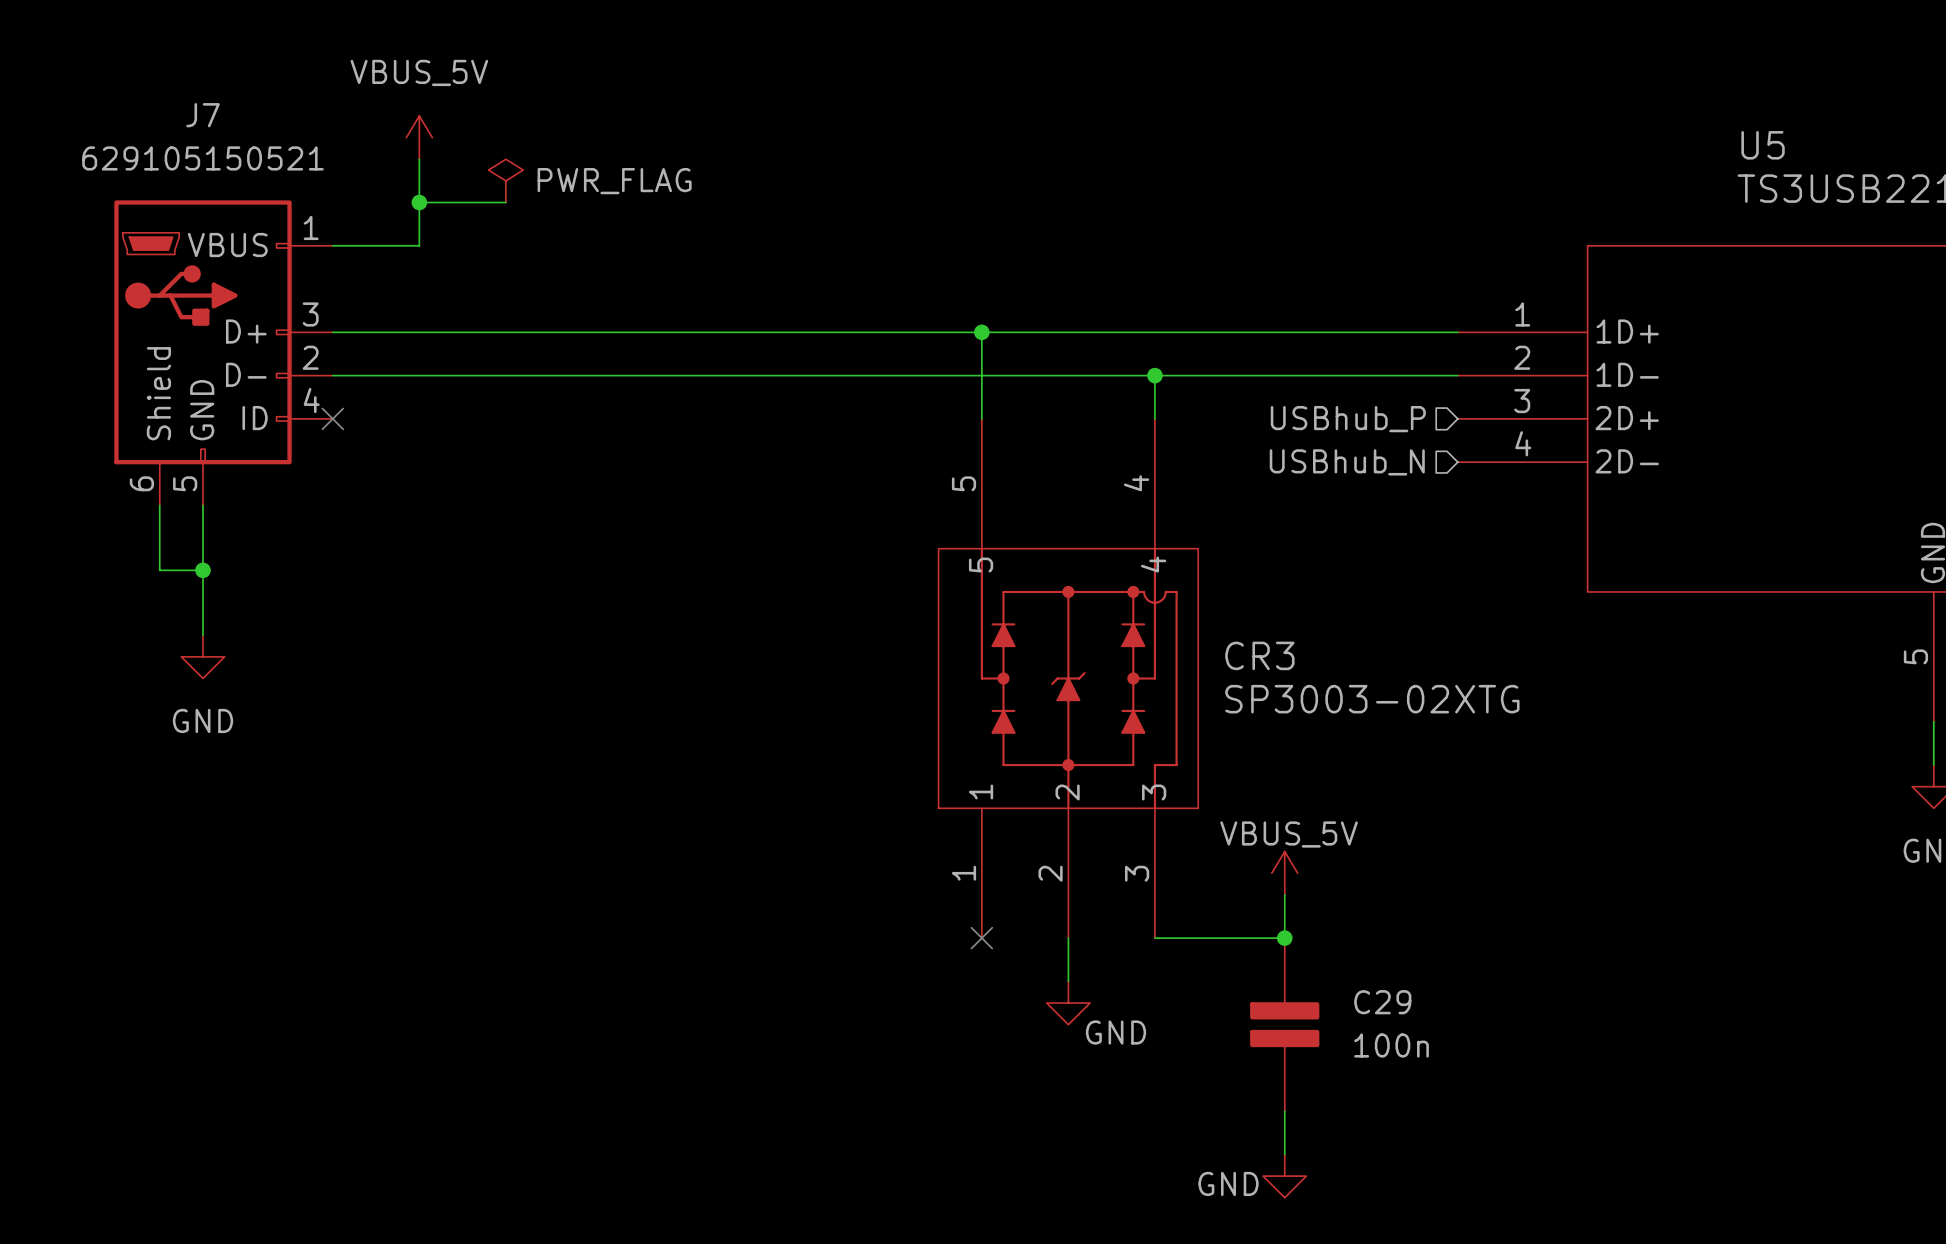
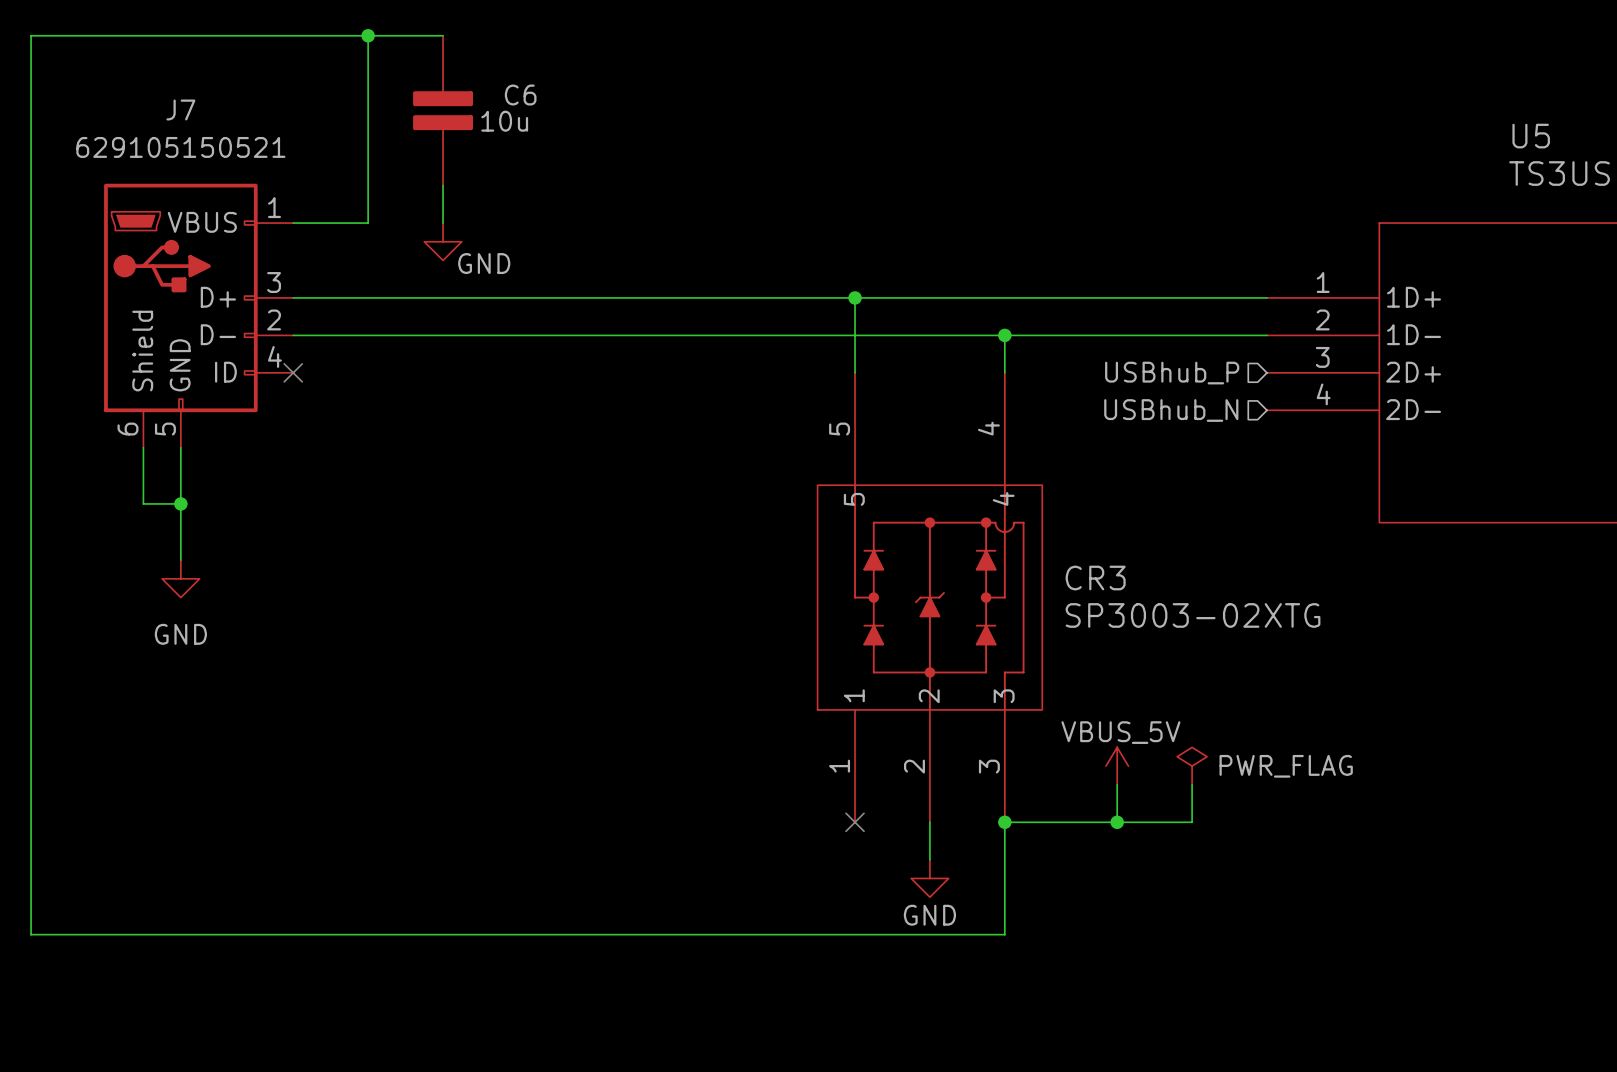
wire: none -> (368, 35) (368, 148)
junction: none -> (368, 35)
wire: none -> (443, 35) (31, 35) (31, 934) (1004, 934) (1004, 822)
C6: none -> 10u (443, 110)
power symbol: VBUS_5V (419, 137) -> none
power symbol: PWR_FLAG (505, 180) -> none
wire: (419, 202) (505, 202) -> (443, 223) (443, 185)
junction: (419, 202) -> none
power symbol: none -> GND (443, 241)
power symbol: none -> PWR_FLAG (1192, 766)
wire: none -> (1192, 784) (1192, 822) (1117, 822)
junction: none -> (1004, 822)
C29: 100n (1284, 1024) -> none
power symbol text position: GND (1116, 1032) -> GND (929, 915)
wire: (1284, 1111) (1284, 1154) -> none
power symbol: GND (1284, 1176) -> none

